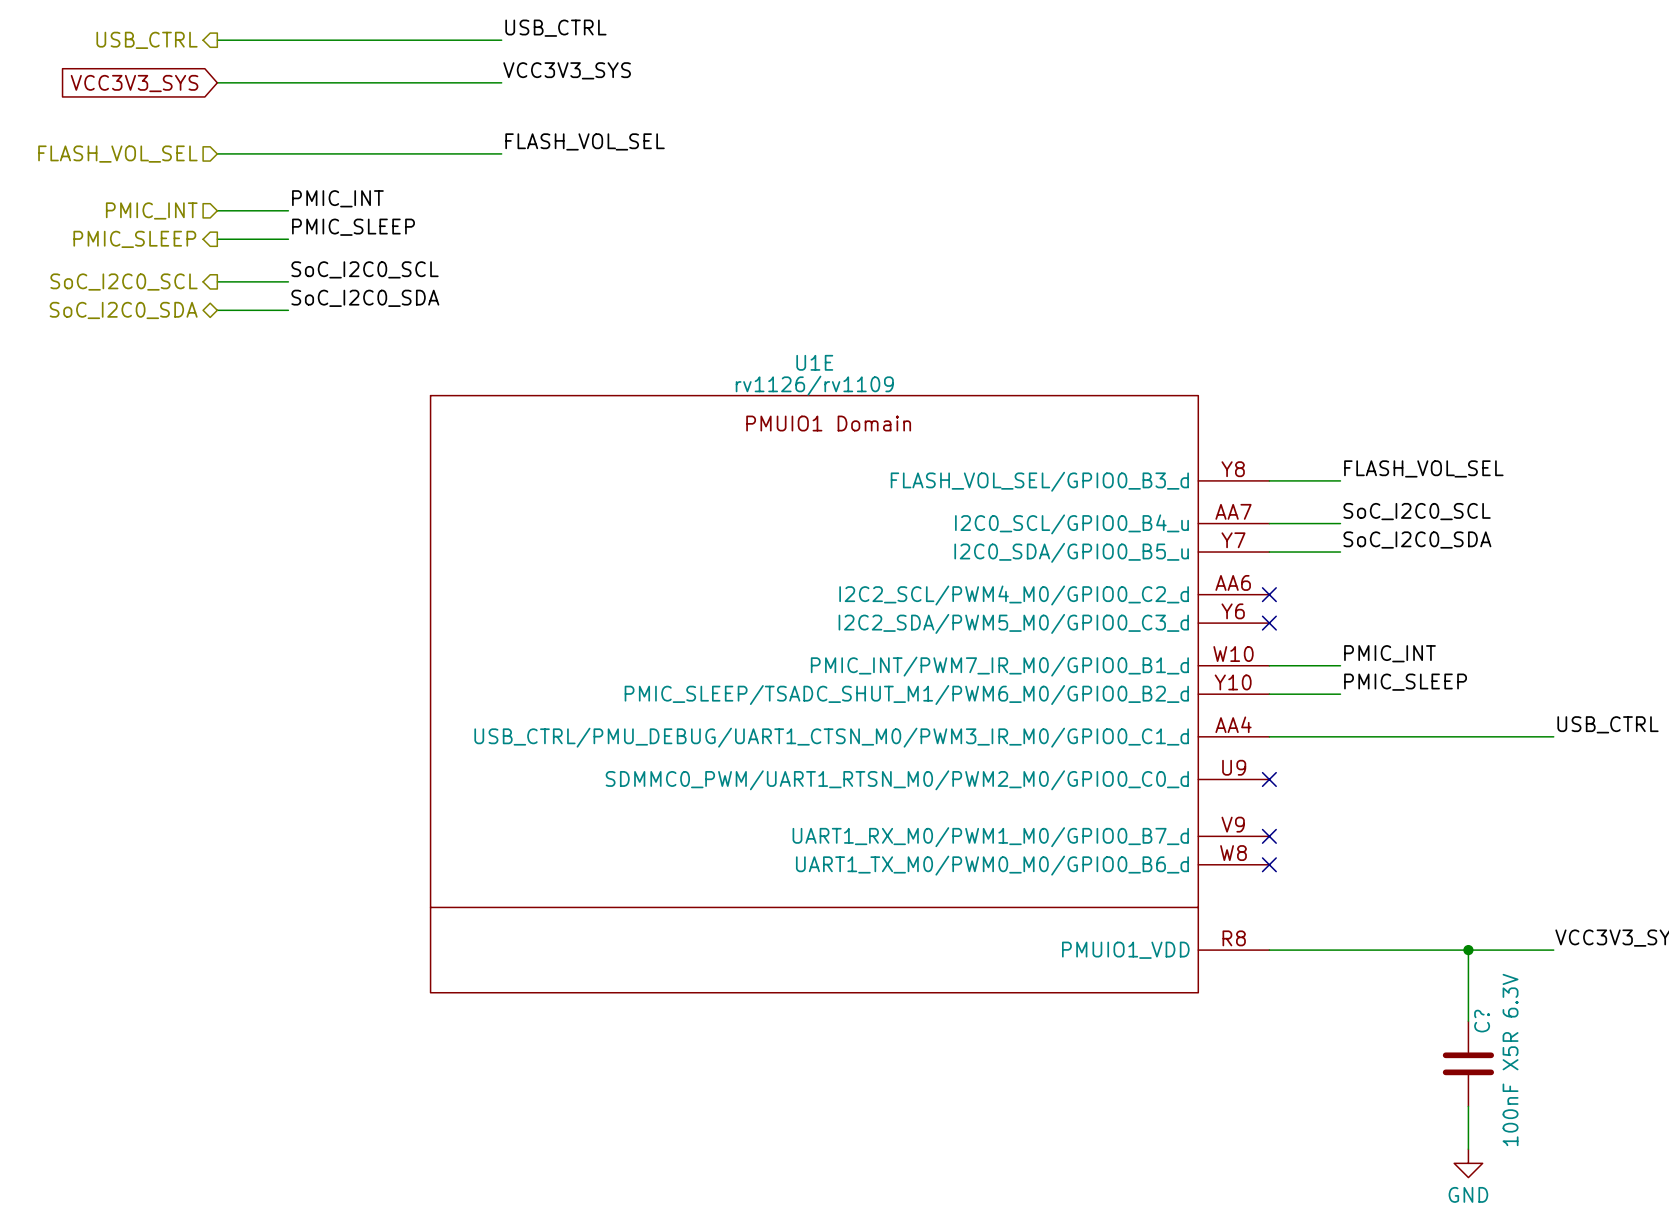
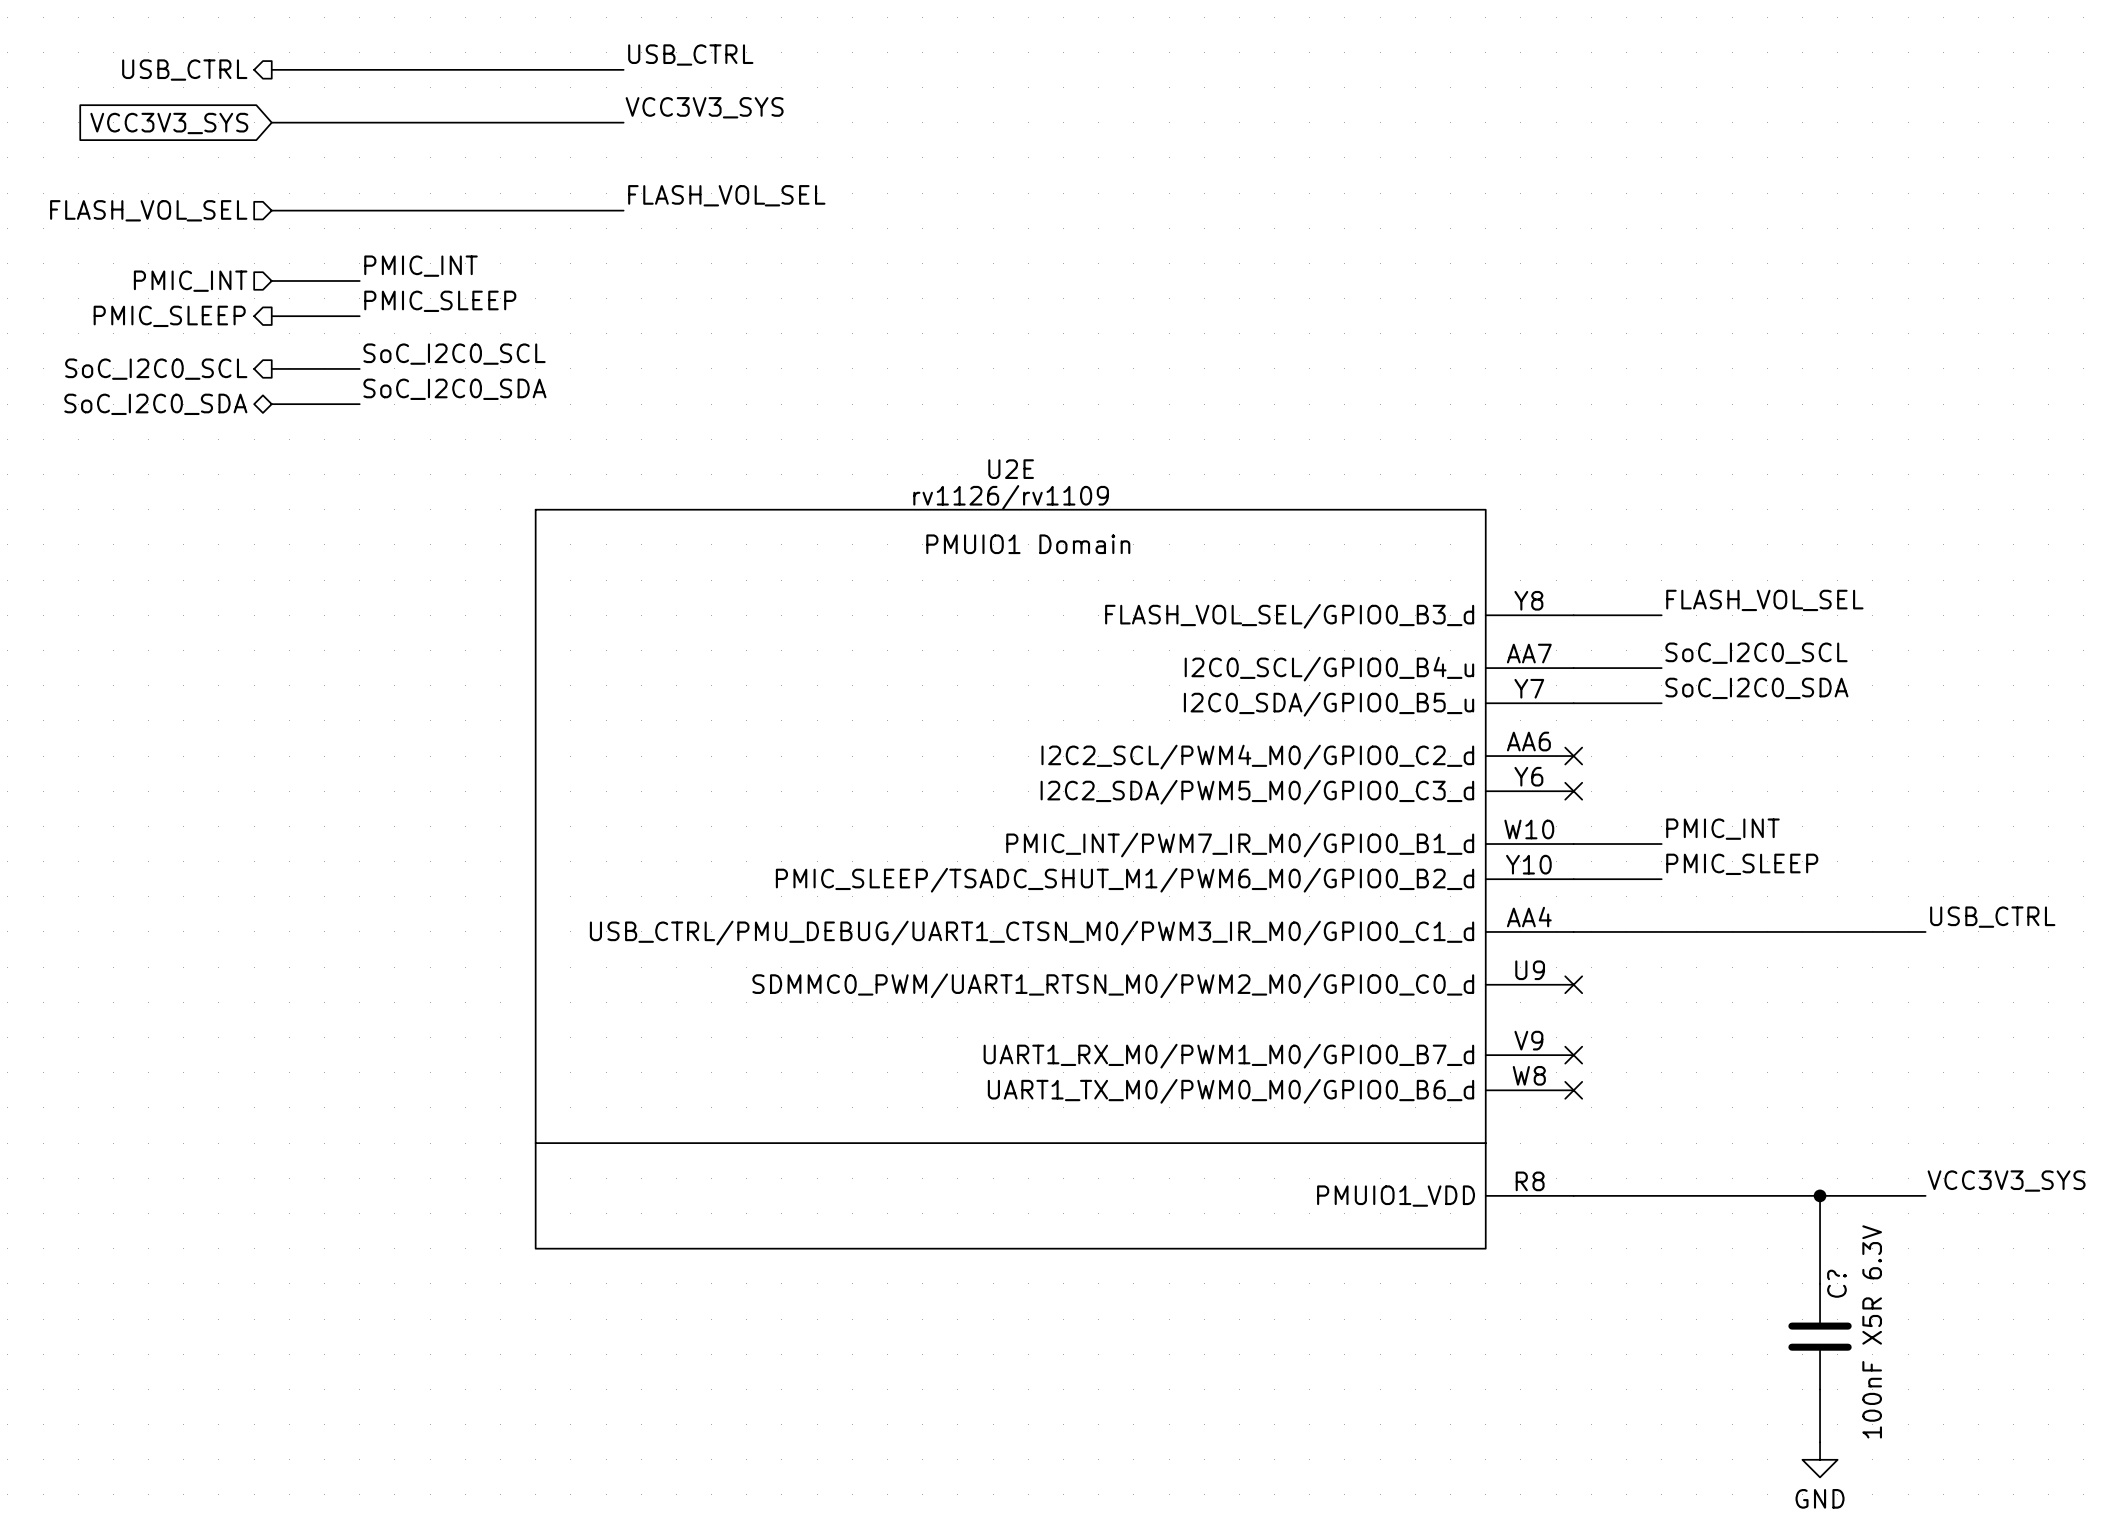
U1E name: U1E (814, 362) -> U2E (1011, 469)

